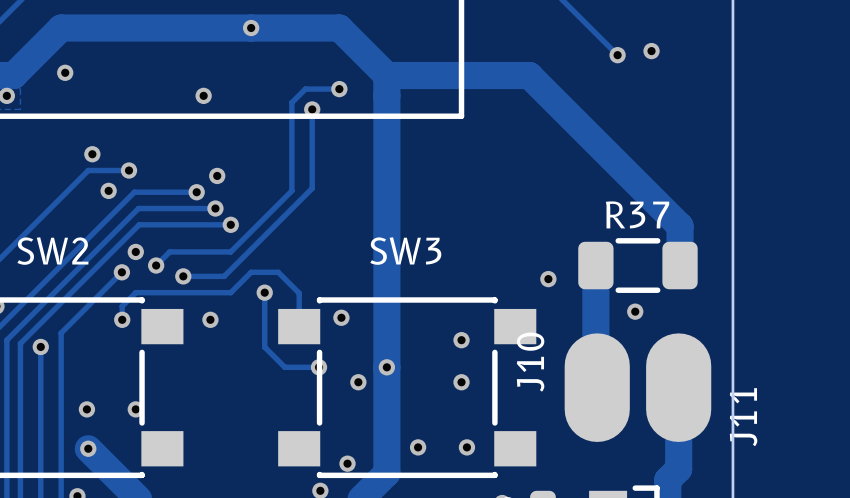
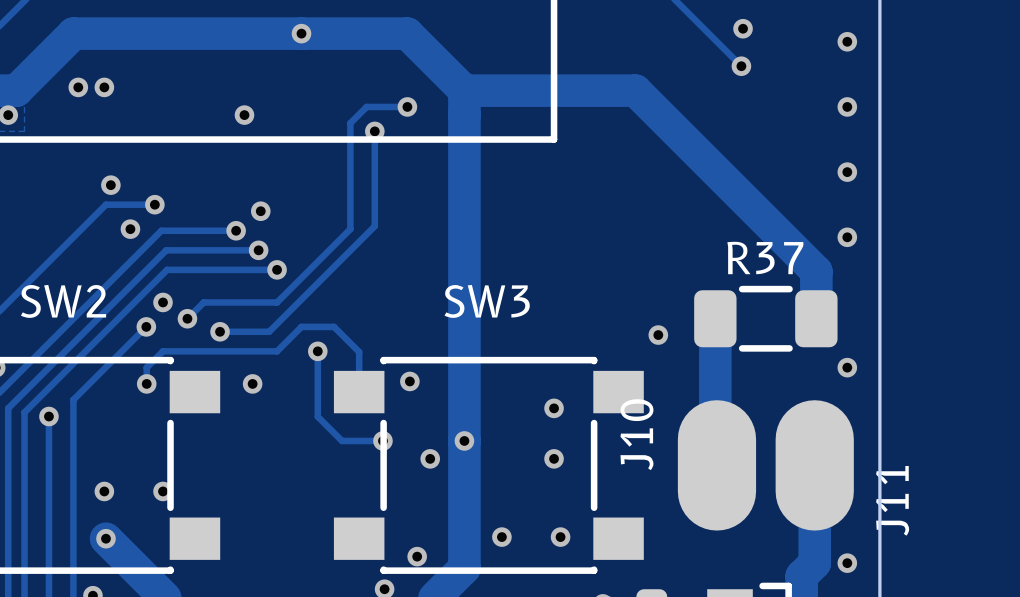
via: none -> (743, 28)
via: none -> (847, 41)
via: (651, 51) -> none
via: none -> (104, 87)
via: none -> (847, 106)
via: none -> (847, 172)
via: none -> (847, 237)
via: none -> (847, 367)
via: (635, 311) -> none
via: none -> (847, 563)

